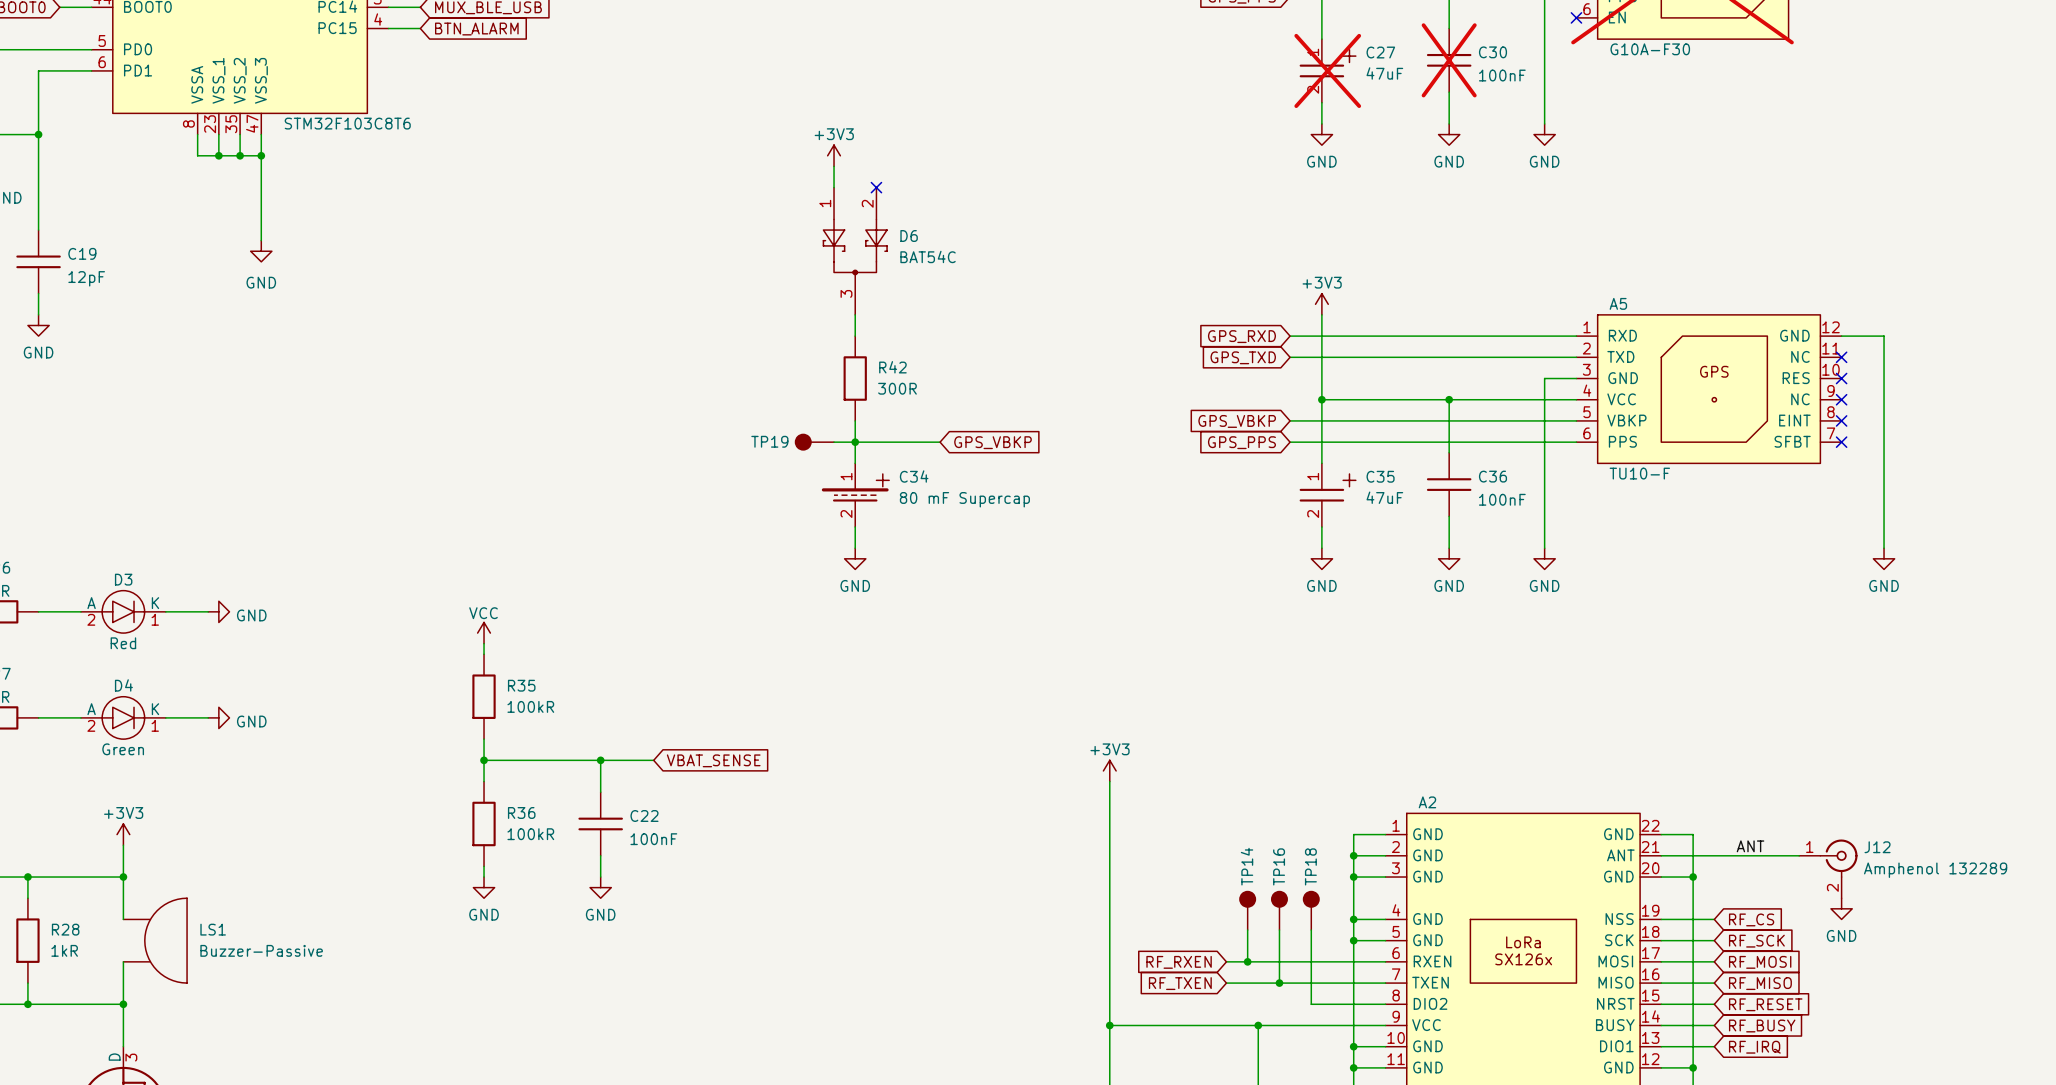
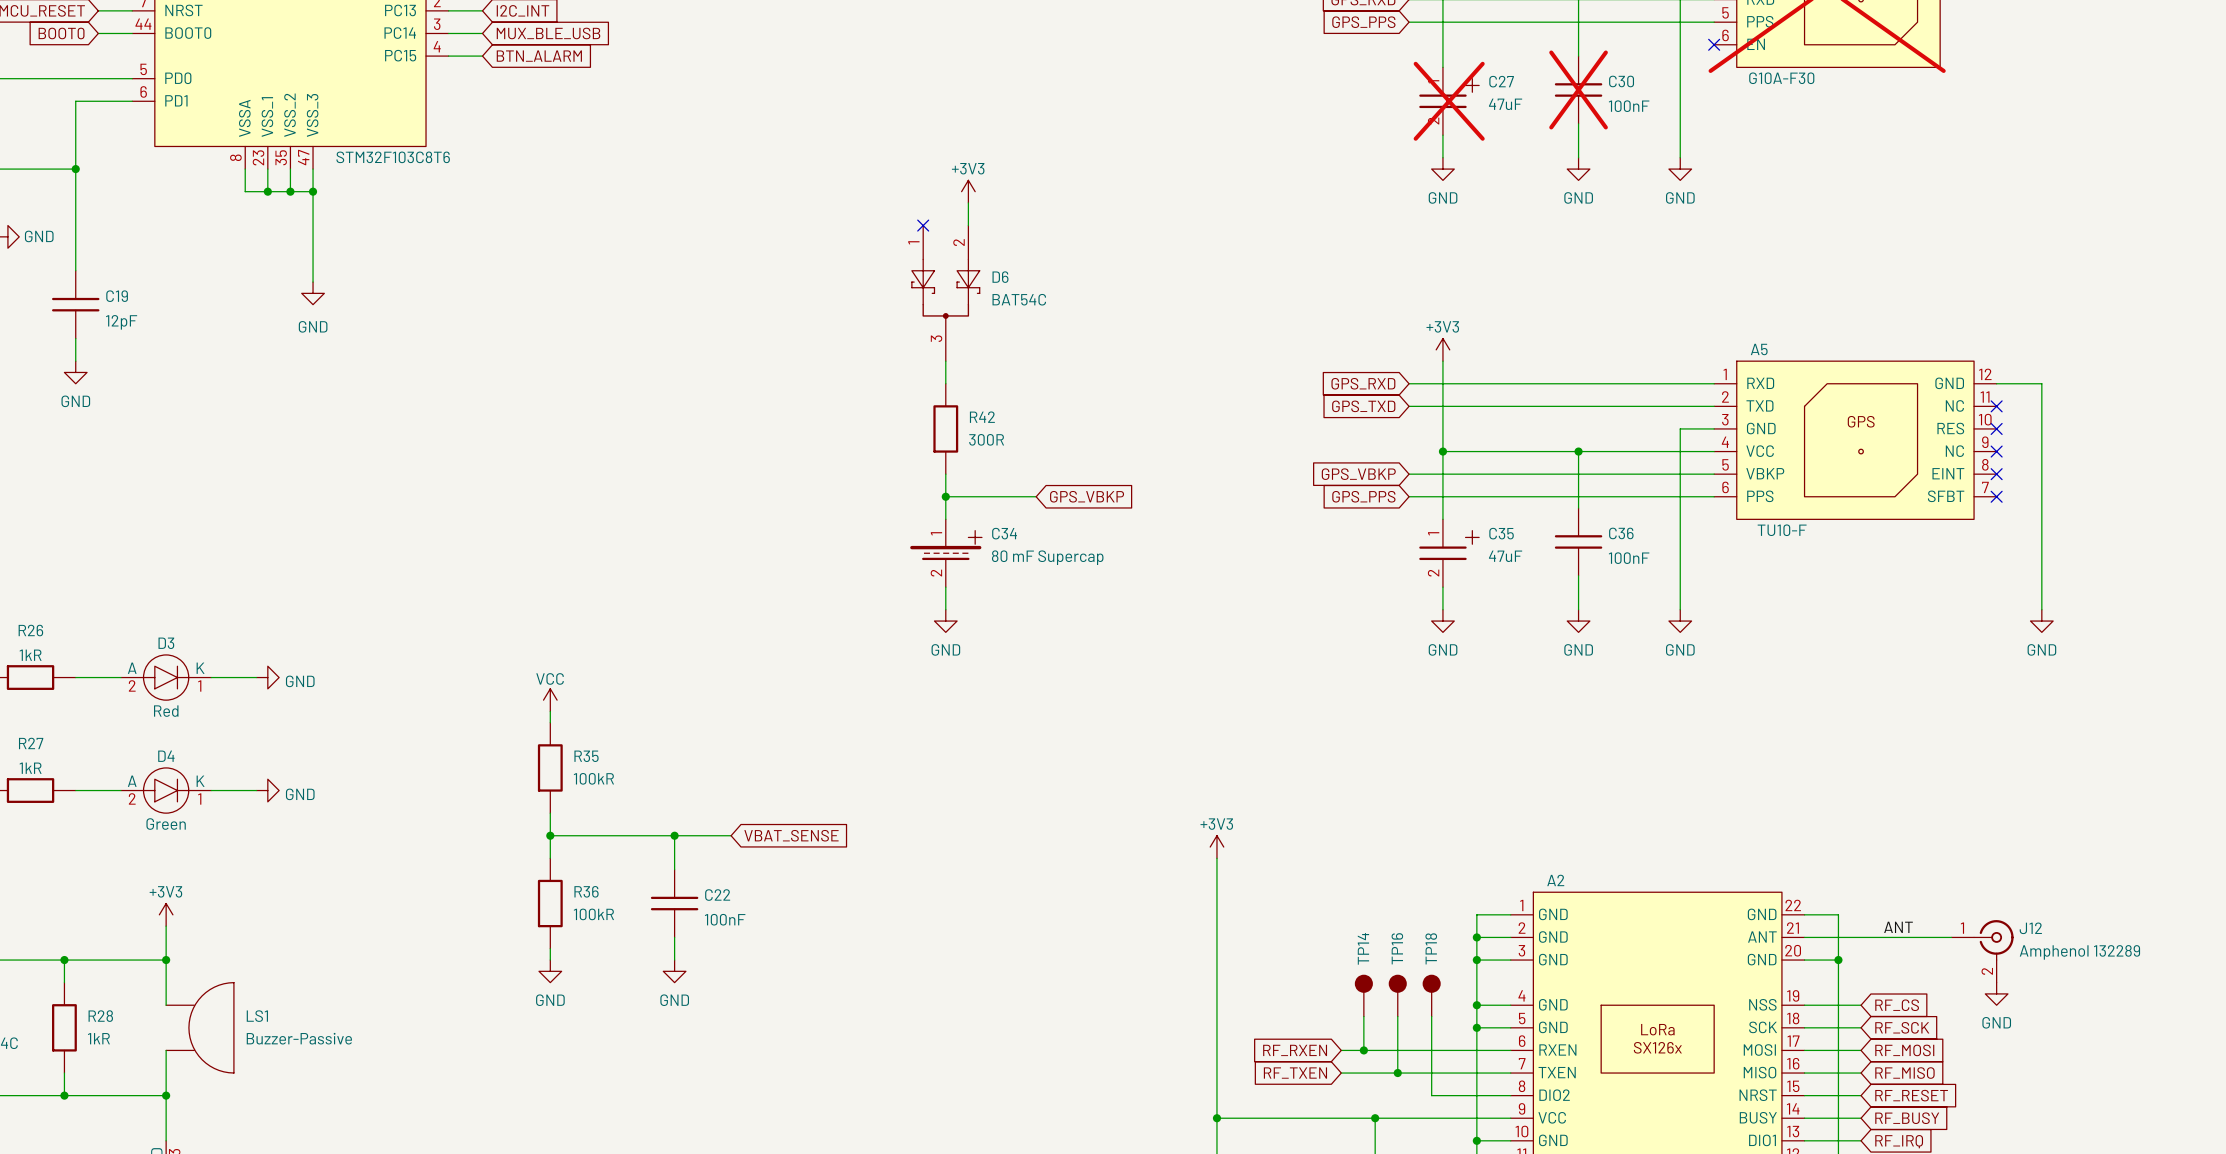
power symbol position: +3V3 (834, 155) -> +3V3 (968, 191)
wire: (834, 166) (834, 187) -> (968, 202) (968, 225)
no-connect mark position: (876, 187) -> (923, 225)
TP19: (814, 442) -> none
wire: (834, 442) (855, 442) -> none

